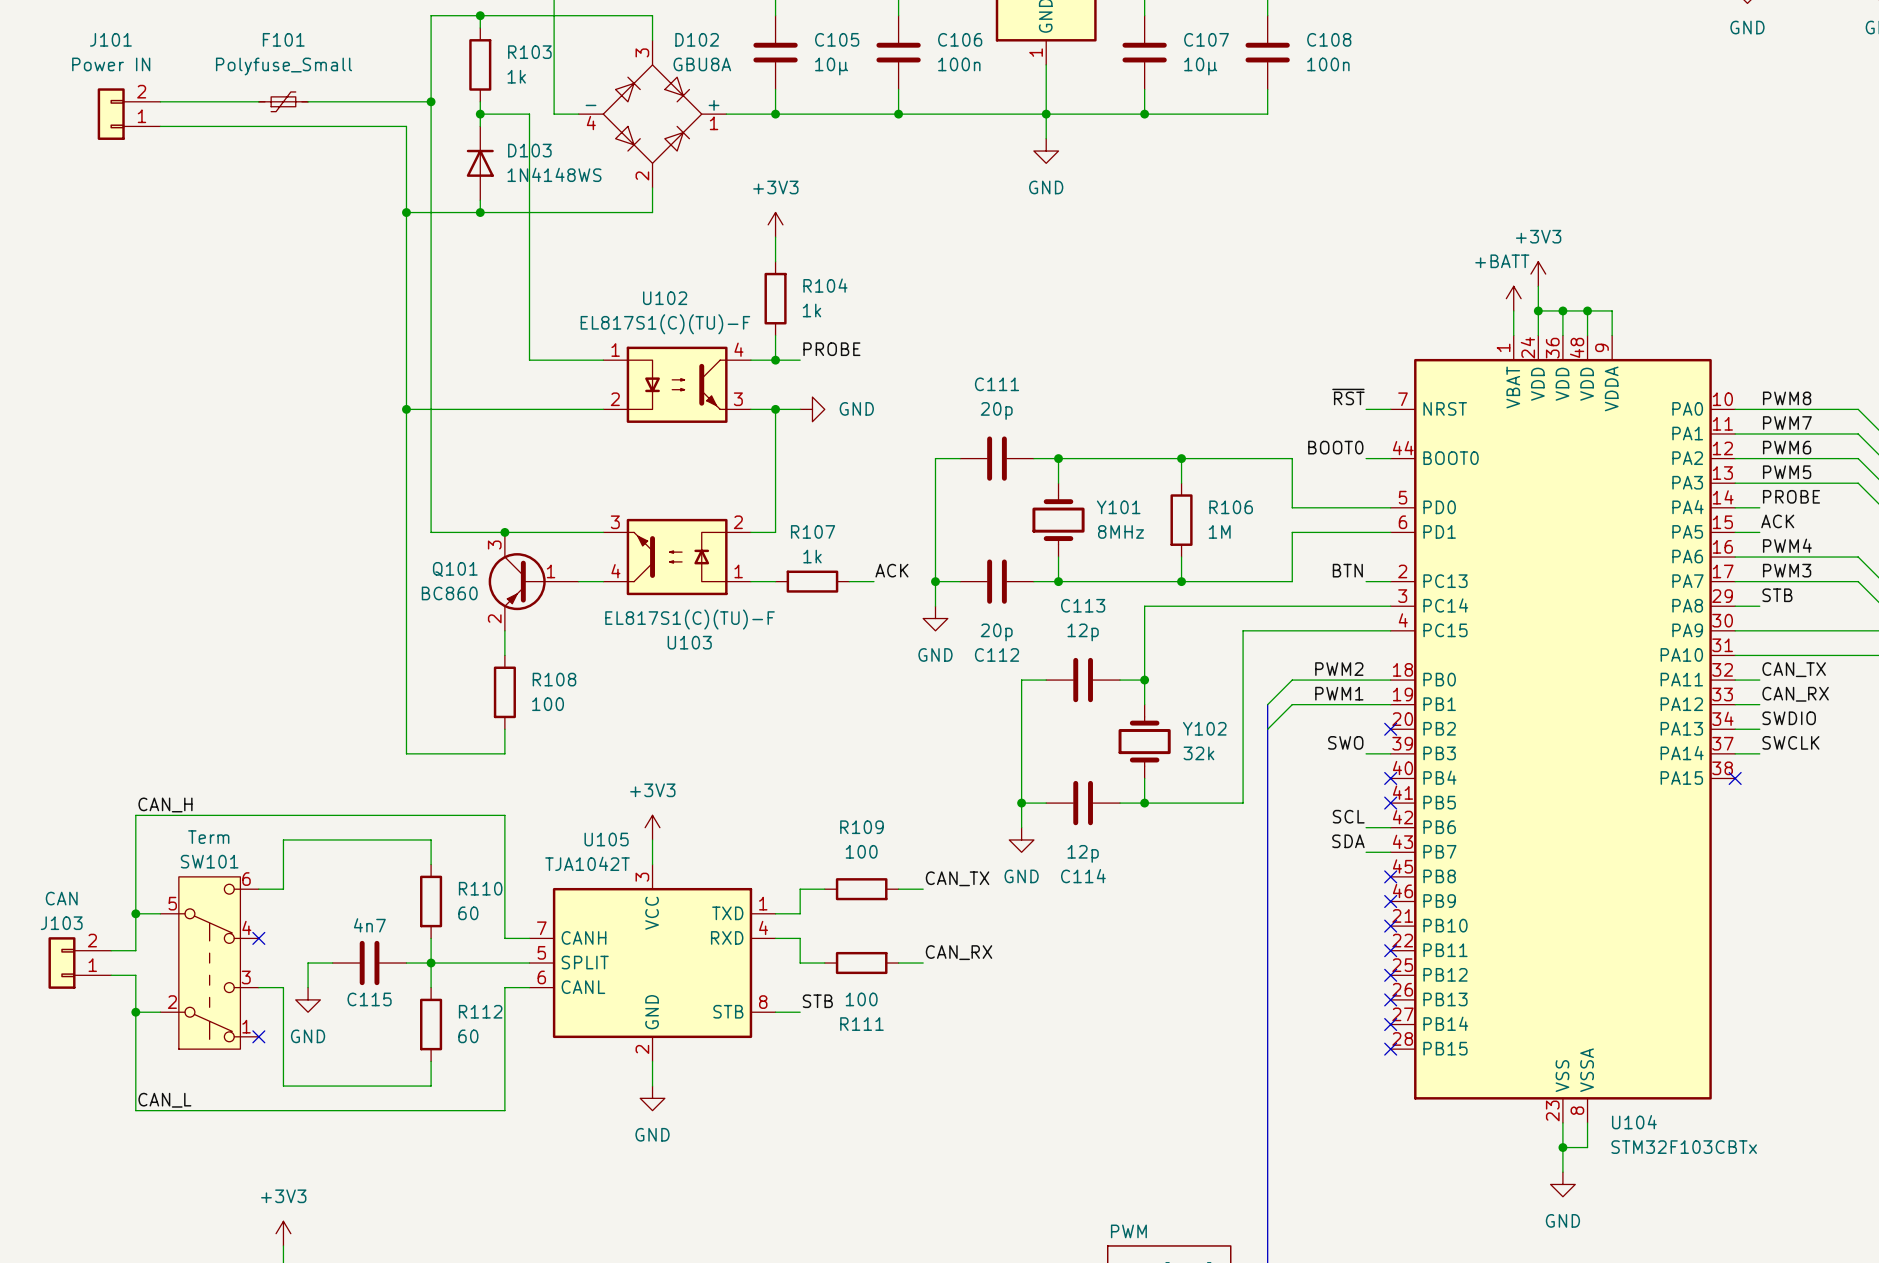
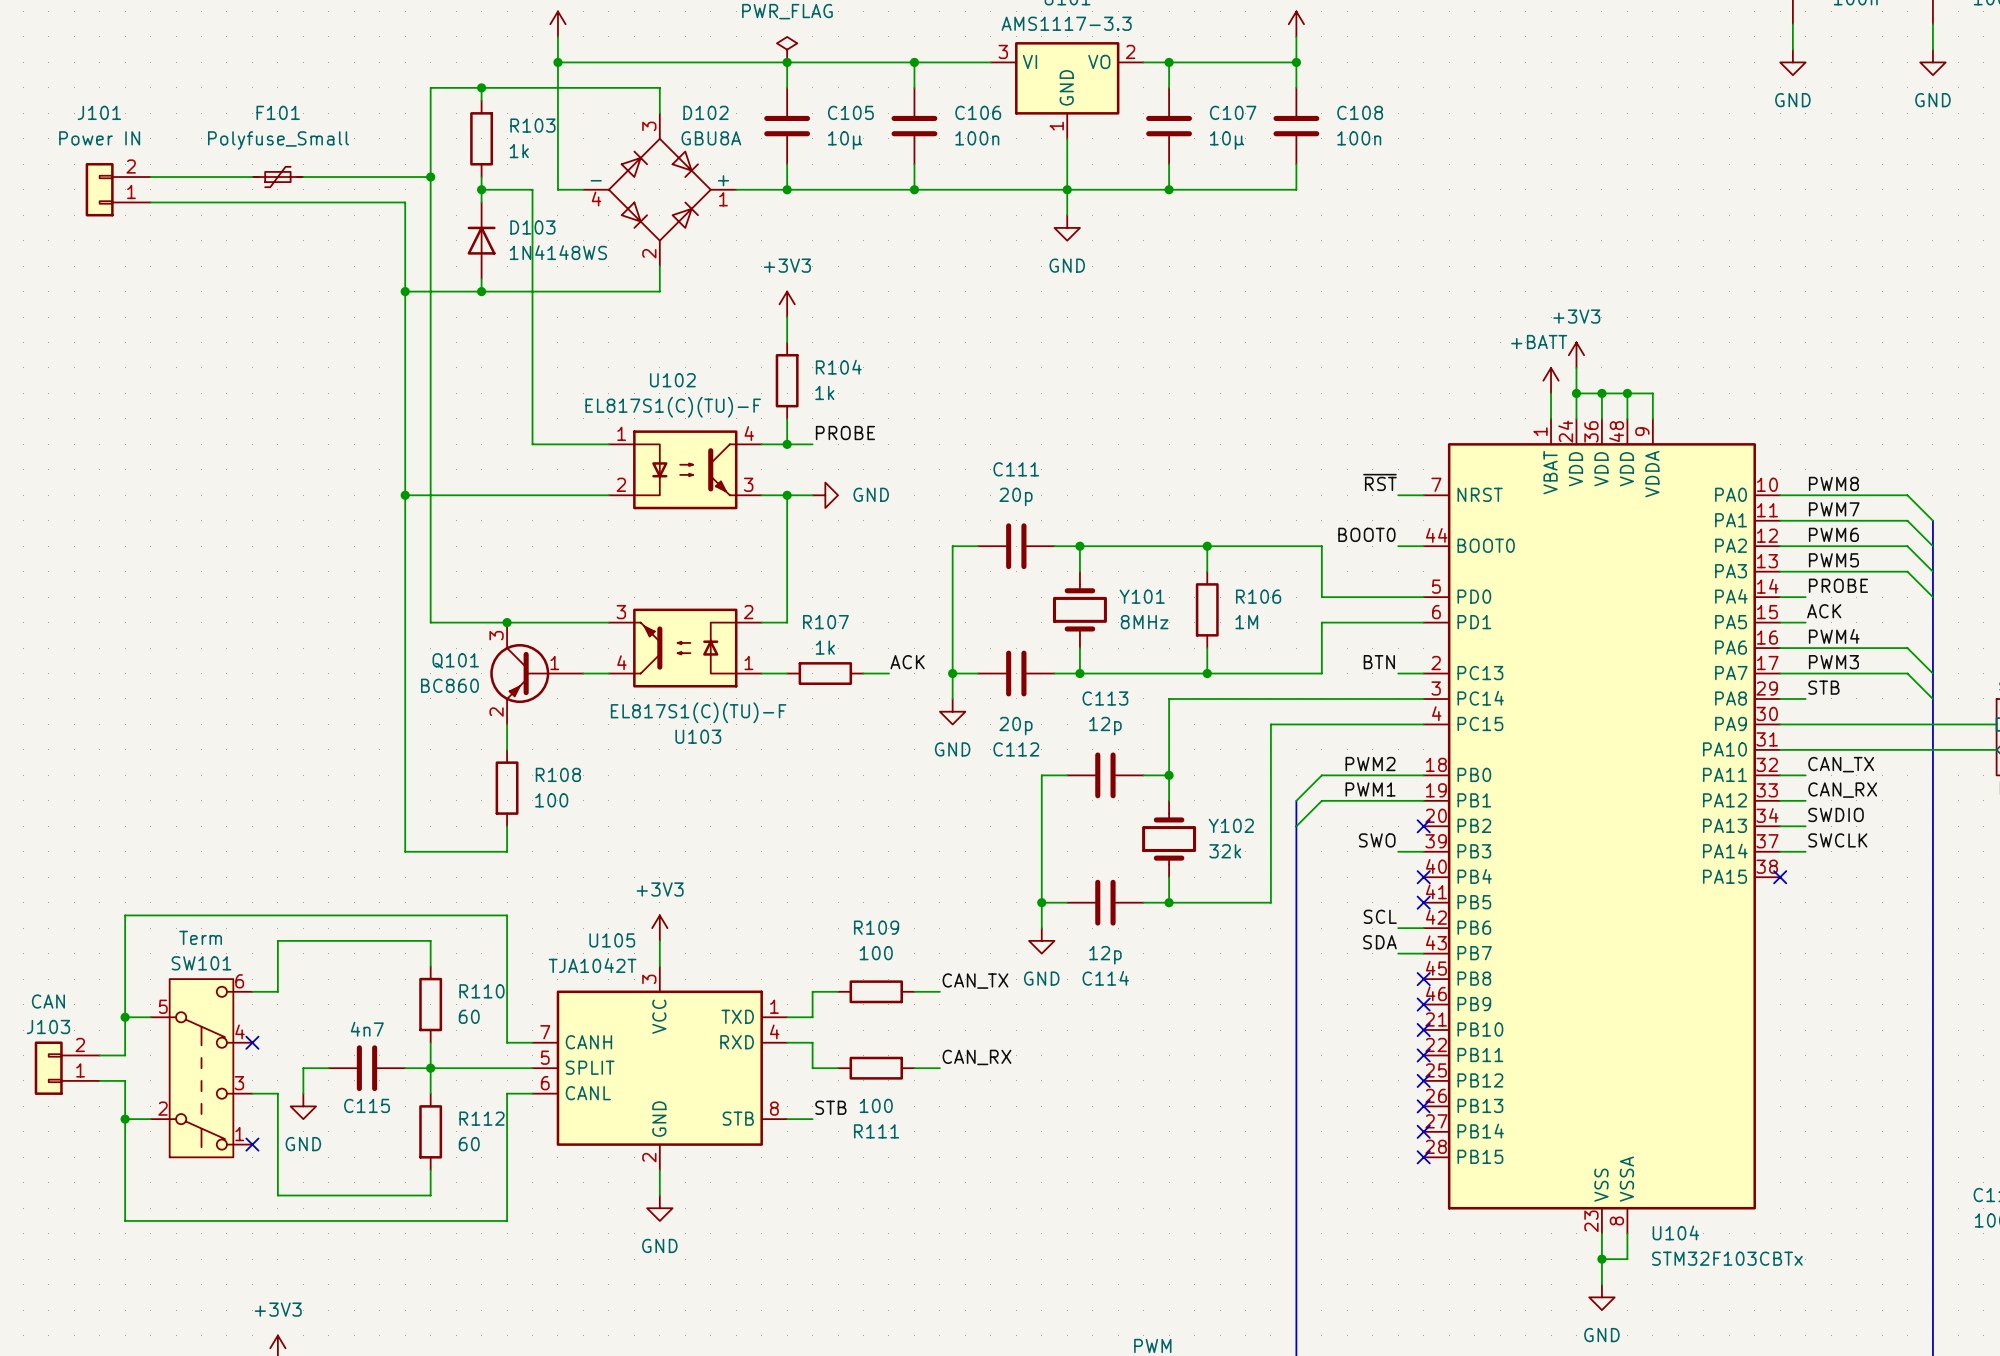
label: CAN_H (165, 804) -> none
label: CAN_L (164, 1100) -> none

